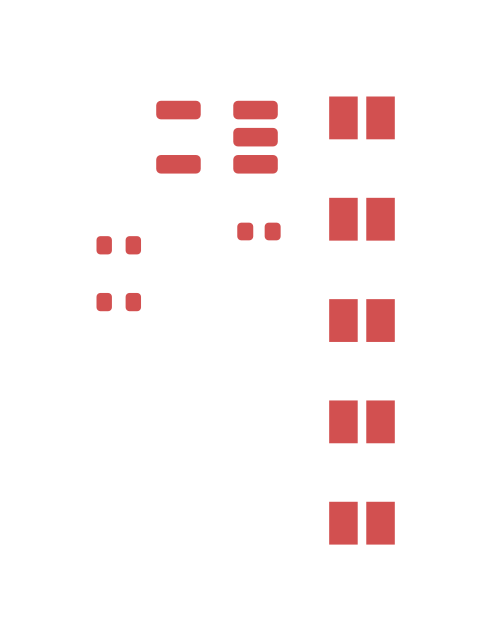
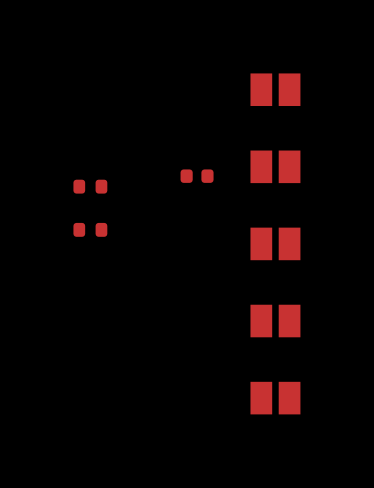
part: (217, 137) -> none

